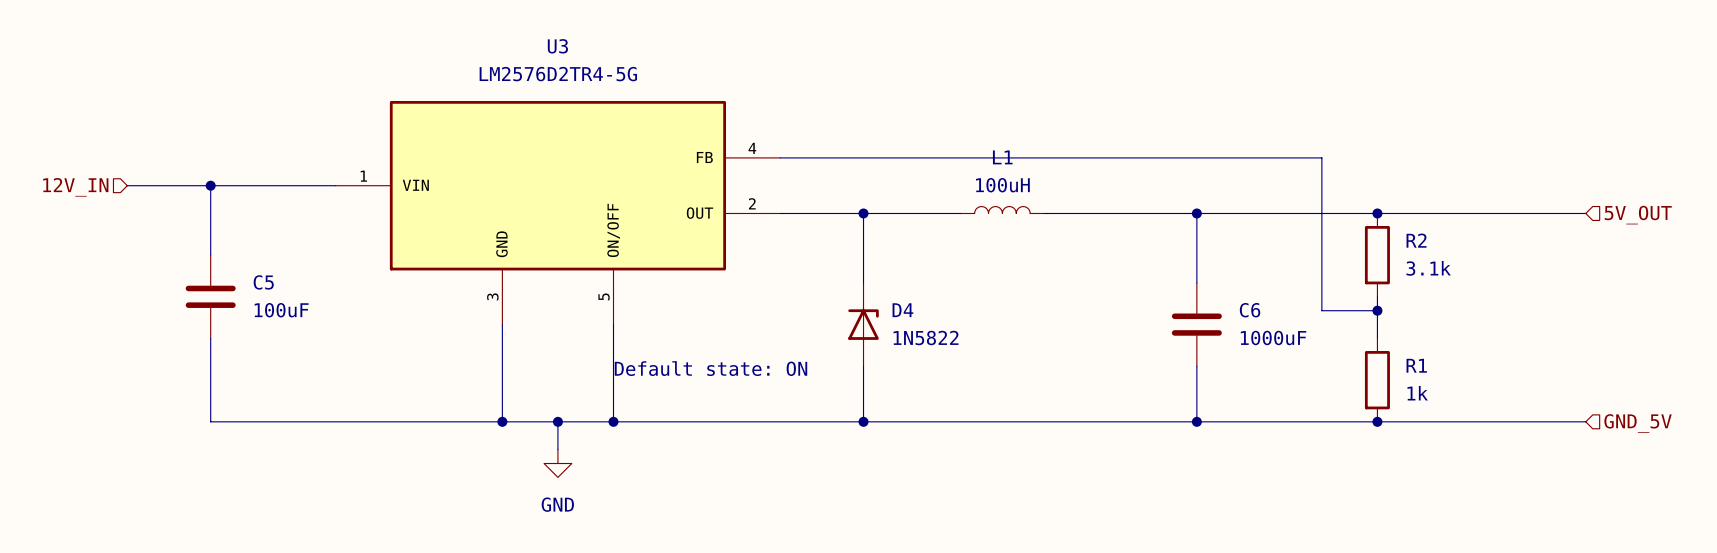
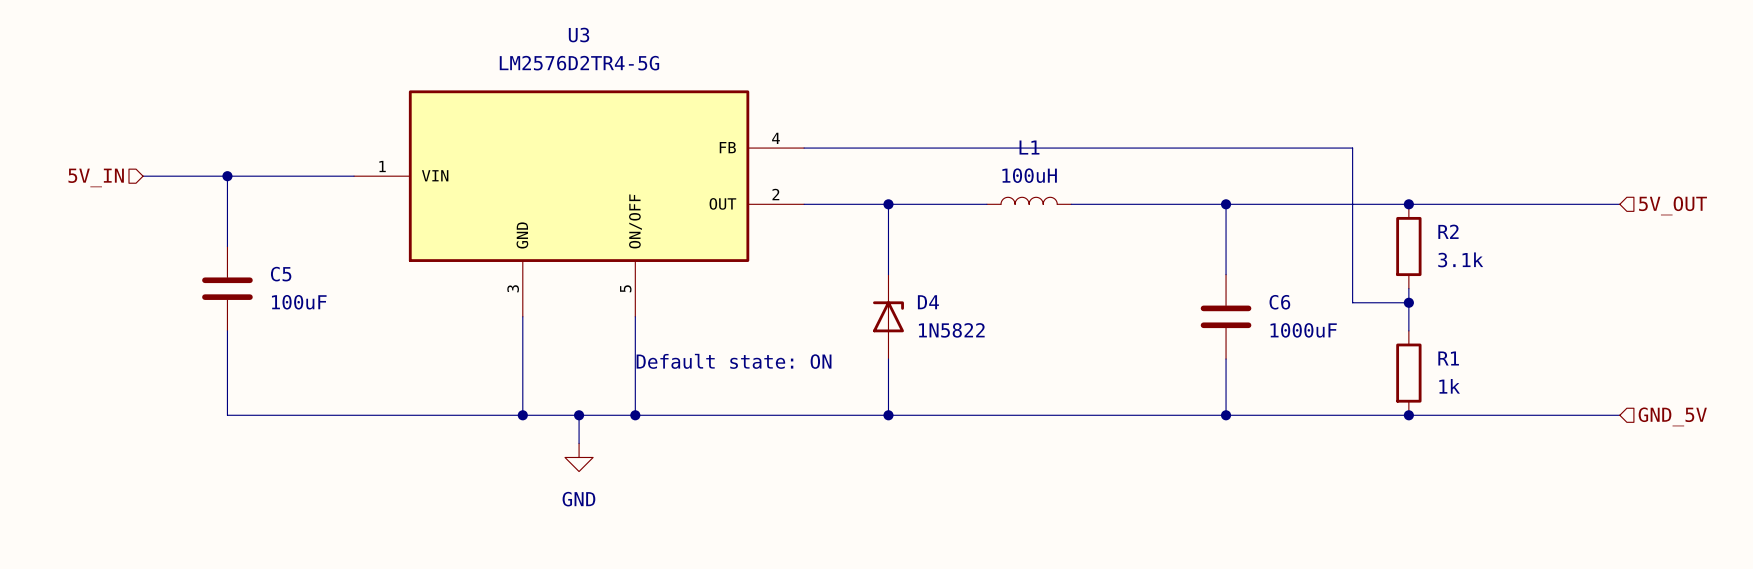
hierarchical label: 12V_IN (75, 187) -> 5V_IN (96, 177)

